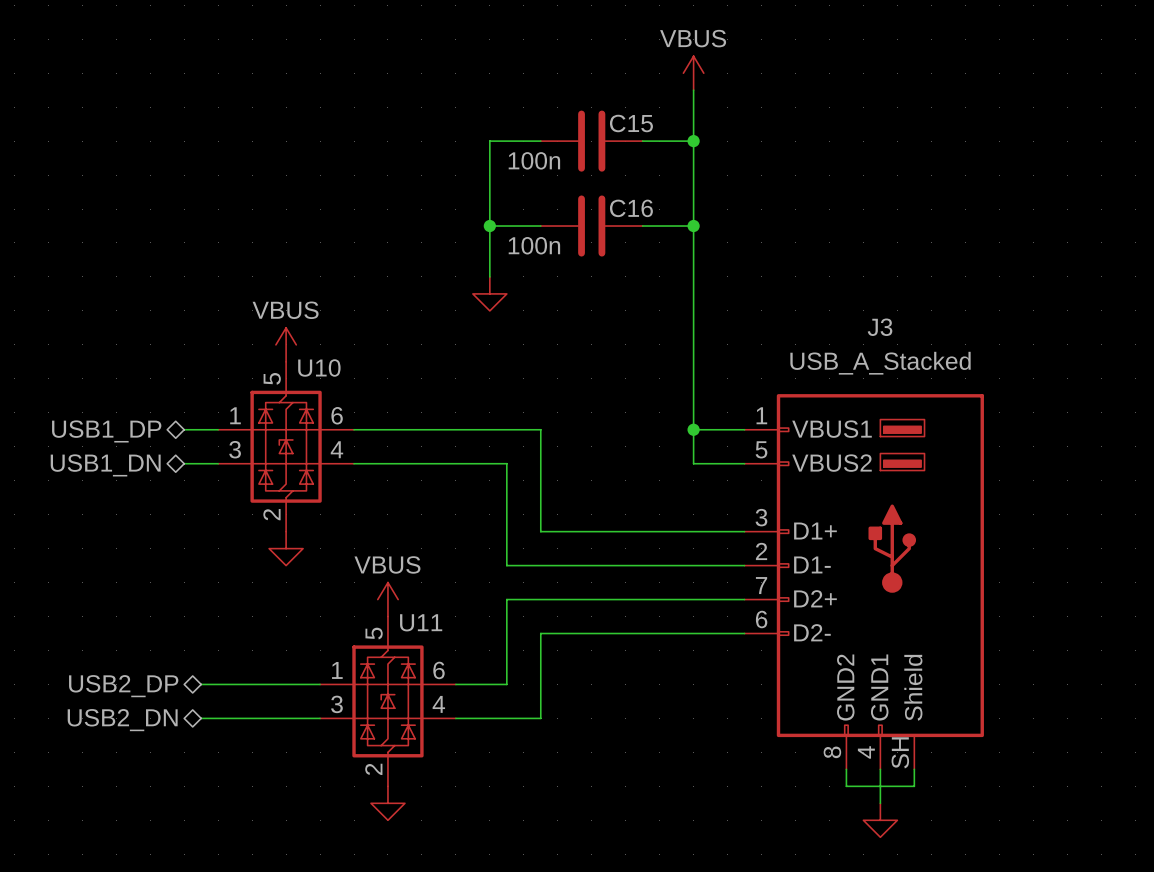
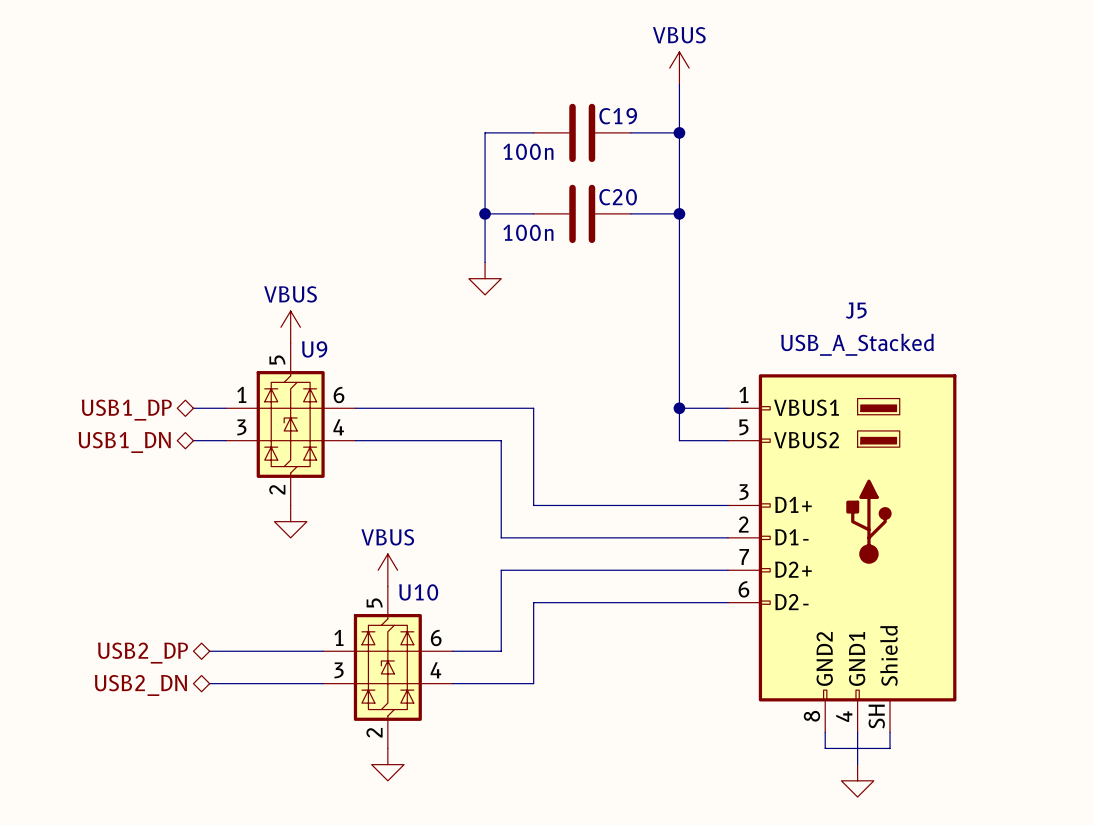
C15 name: C15 (631, 123) -> C19 (618, 116)
C16 name: C16 (631, 208) -> C20 (618, 197)
J3 name: J3 (880, 327) -> J5 (856, 310)
U10 name: U10 (319, 368) -> U9 (314, 349)
U11 name: U11 (421, 622) -> U10 (418, 592)

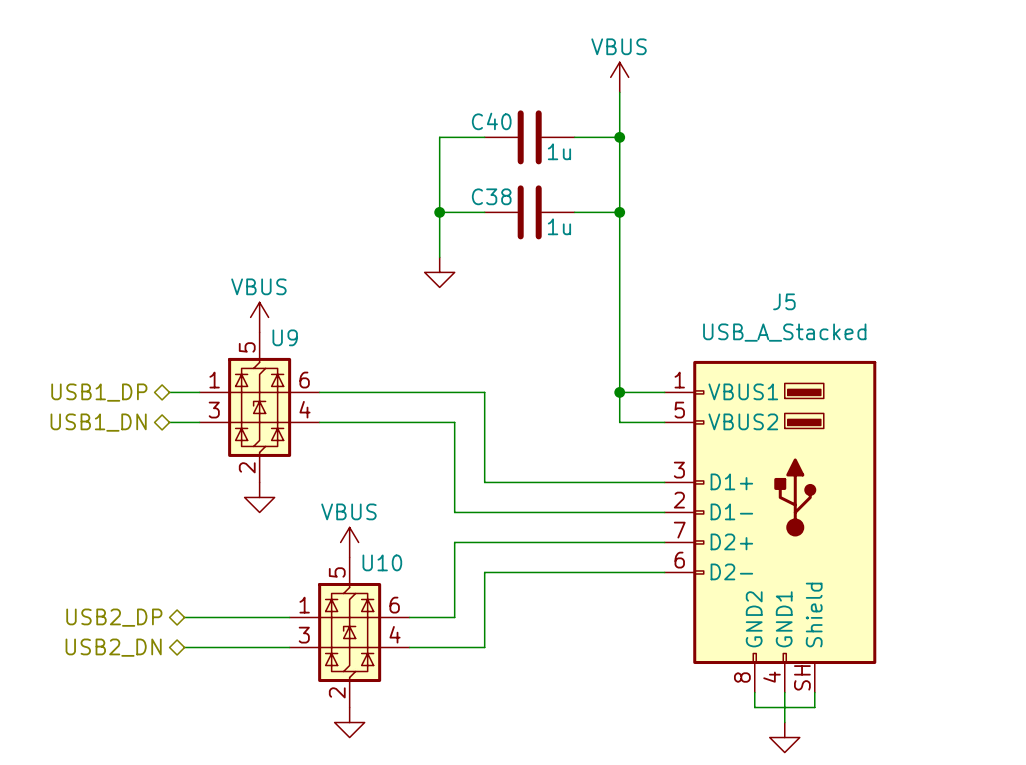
C19 name: C19 (618, 116) -> C40 (491, 121)
C19 value: 100n (528, 151) -> 1u (559, 151)
C20 name: C20 (618, 197) -> C38 (491, 196)
C20 value: 100n (528, 232) -> 1u (559, 226)

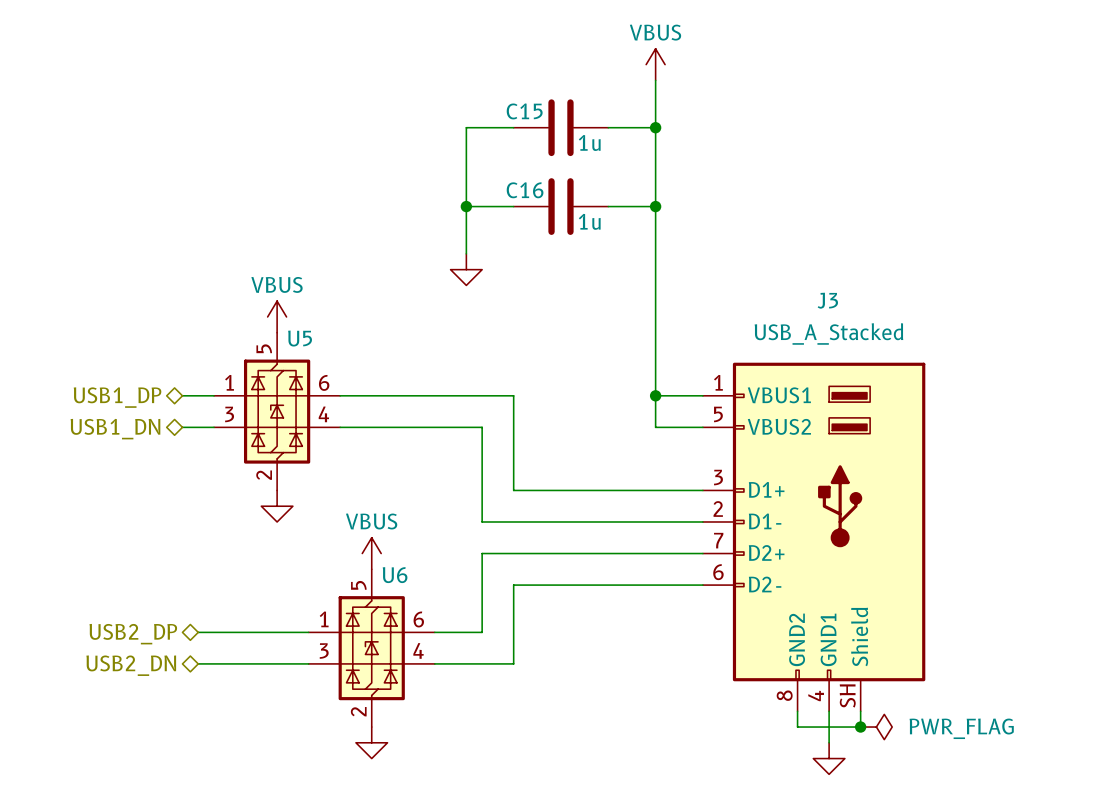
C40 name: C40 (491, 121) -> C15 (524, 111)
C38 name: C38 (491, 196) -> C16 (525, 190)
J5 name: J5 (784, 301) -> J3 (827, 300)
U9 name: U9 (285, 337) -> U5 (300, 338)
U10 name: U10 (382, 562) -> U6 (395, 575)
junction: none -> (860, 727)
power symbol: none -> PWR_FLAG (876, 727)

